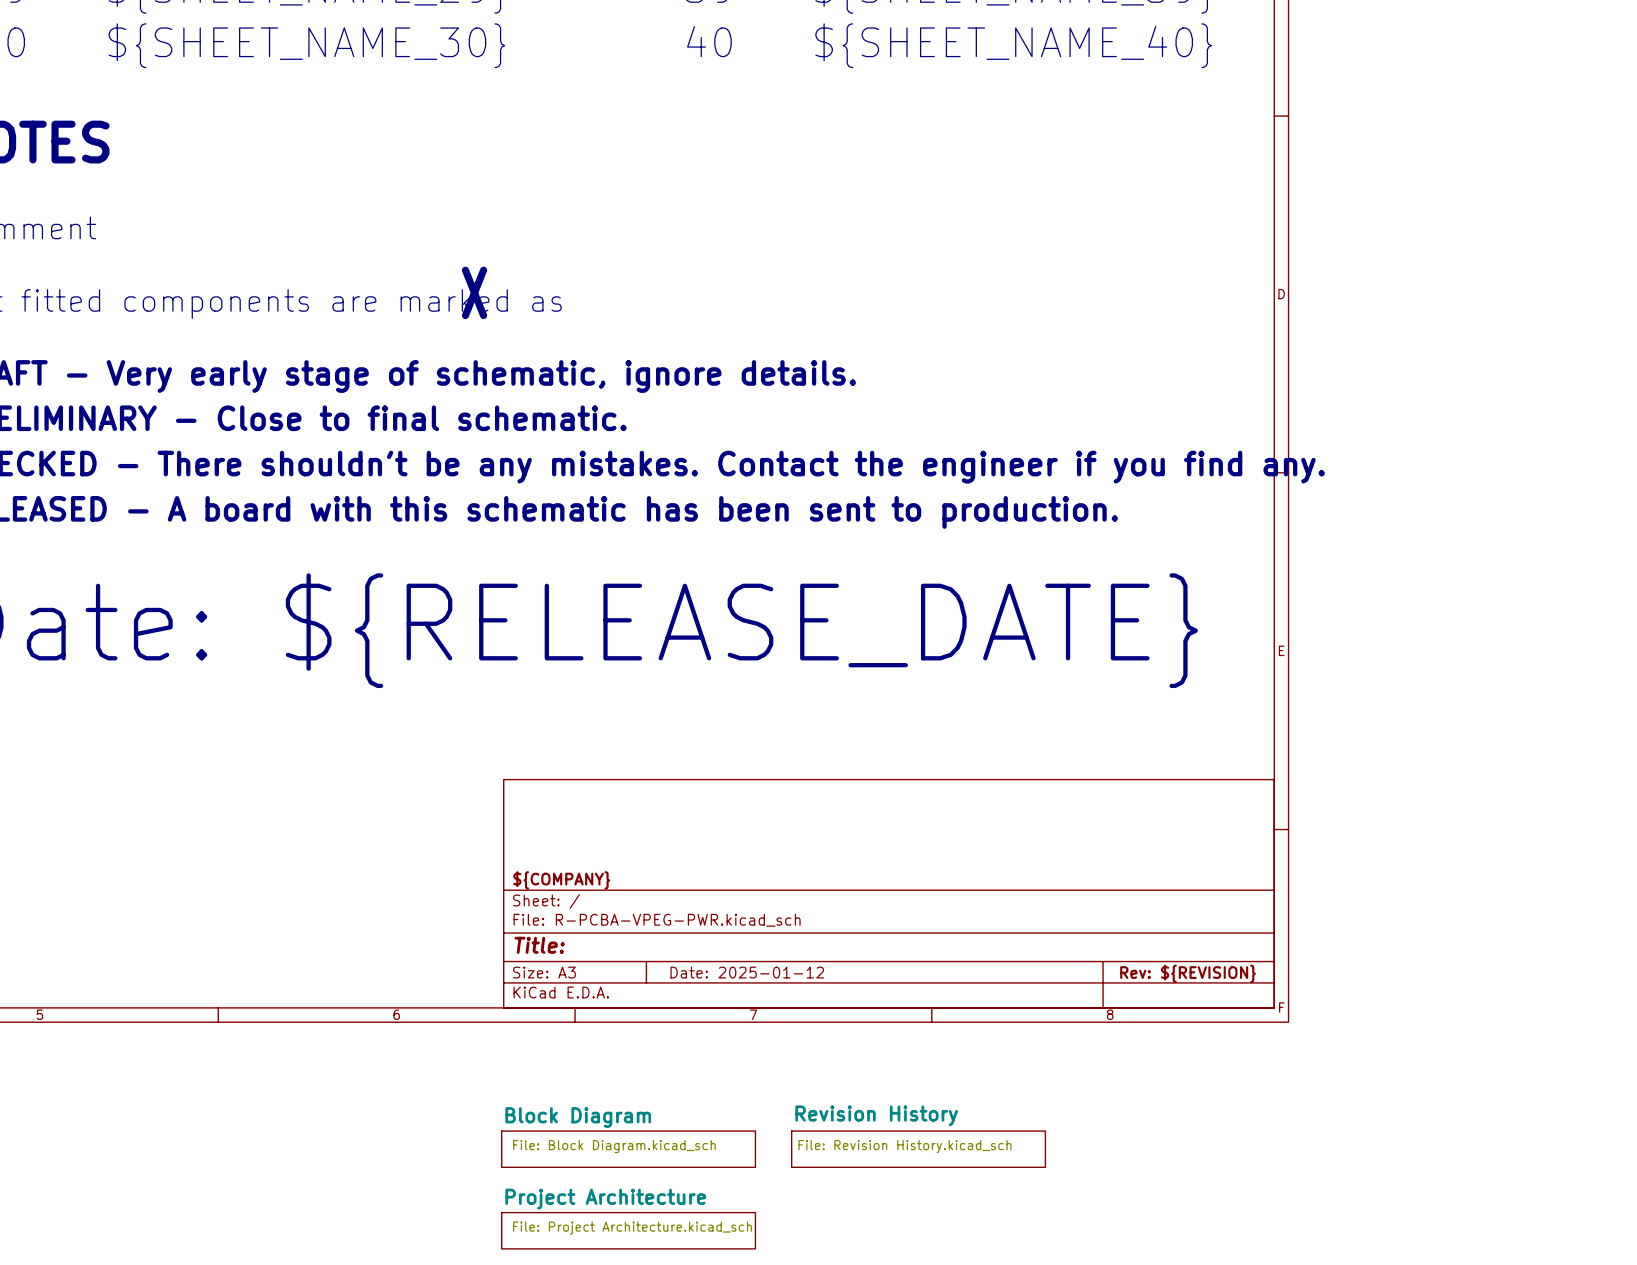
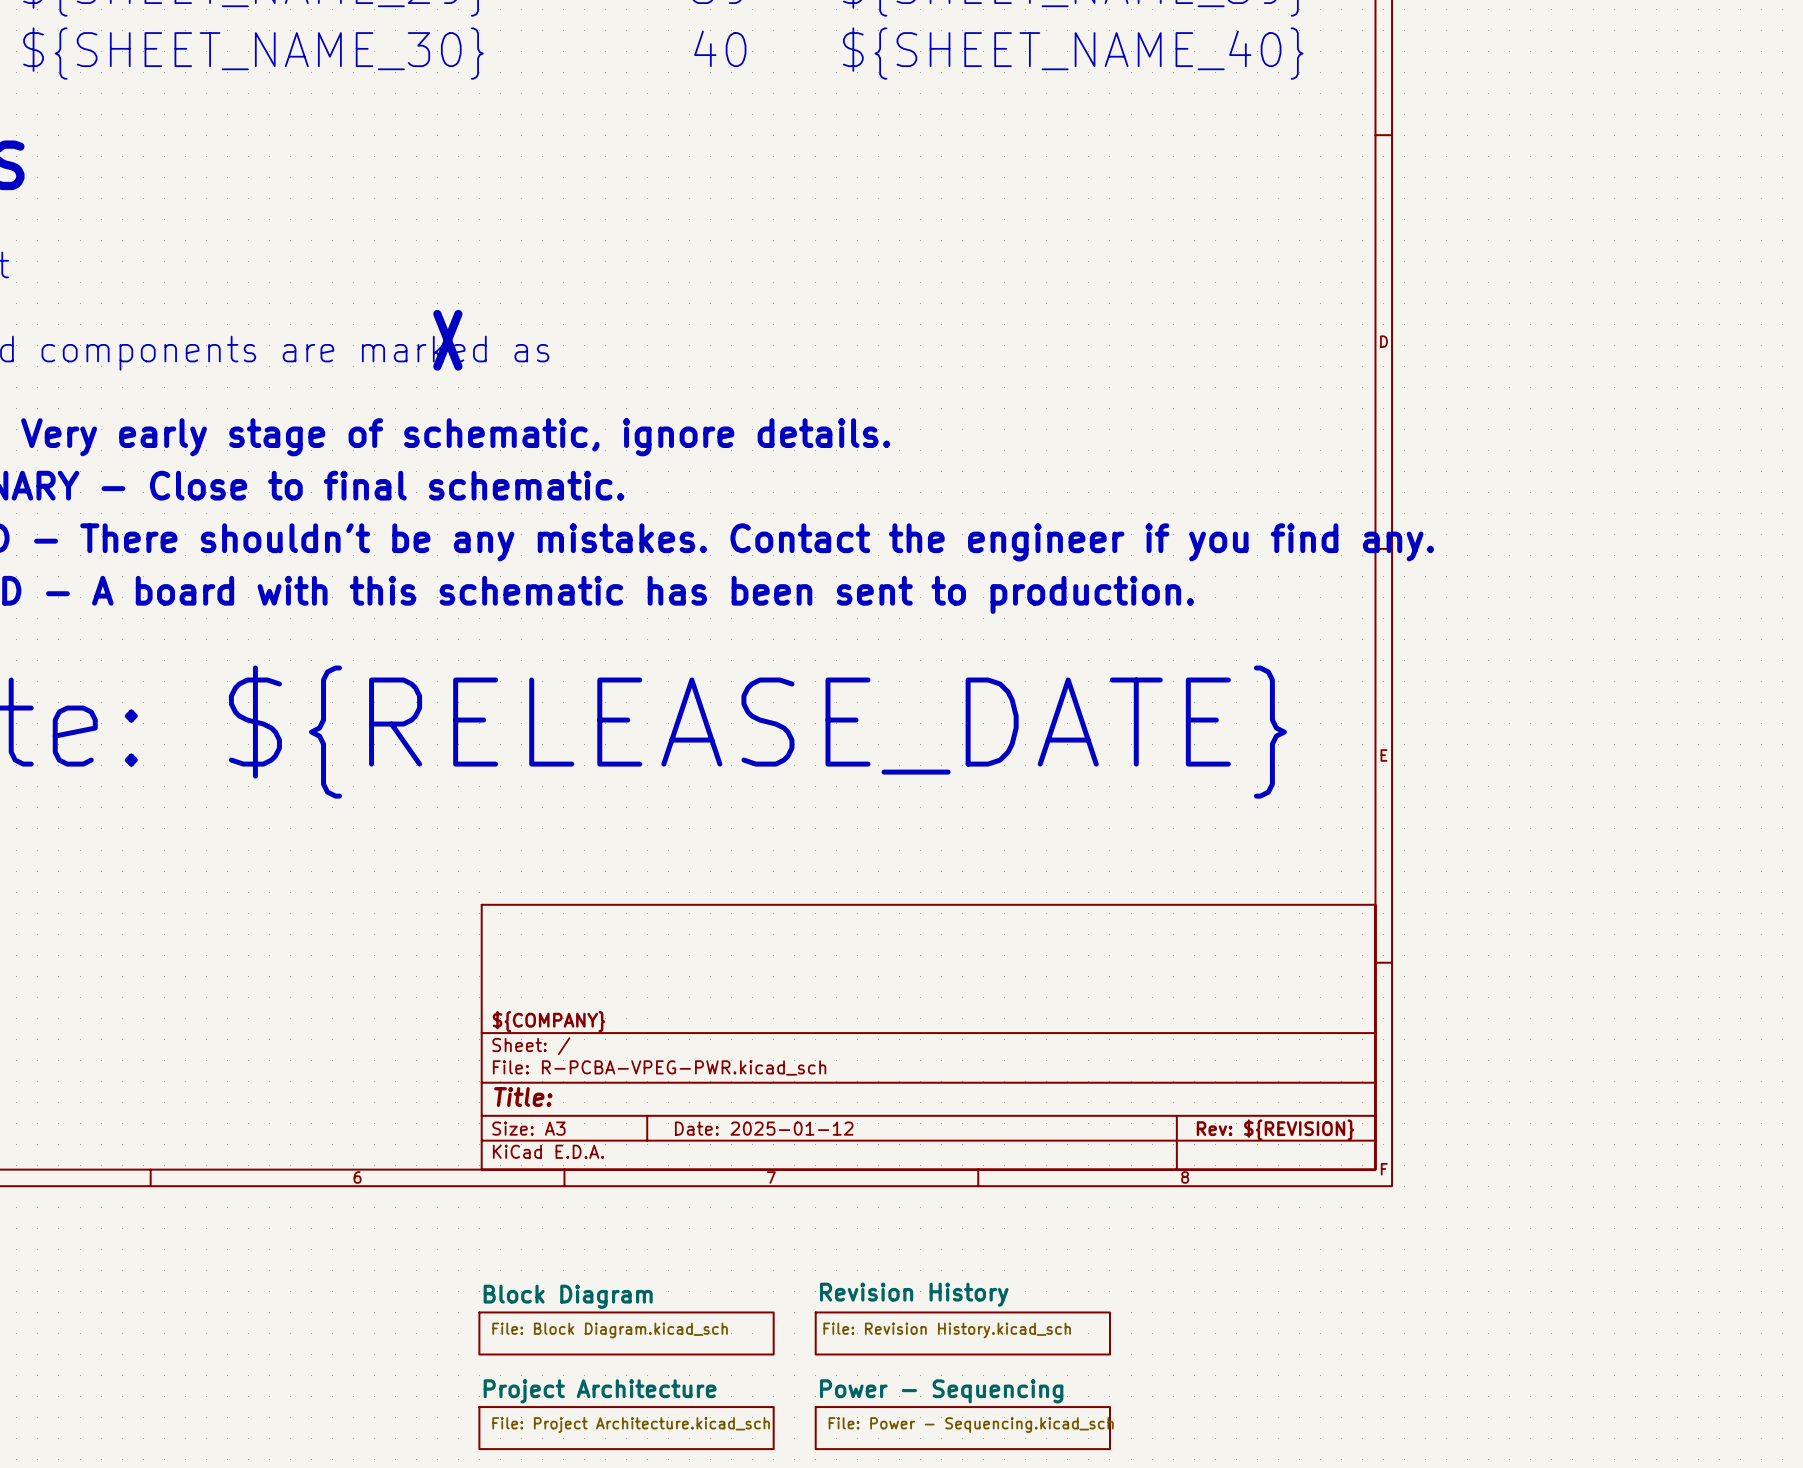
sheet Power - Sequencing: none -> File: Power - Sequencing.kicad_sch (962, 1428)

